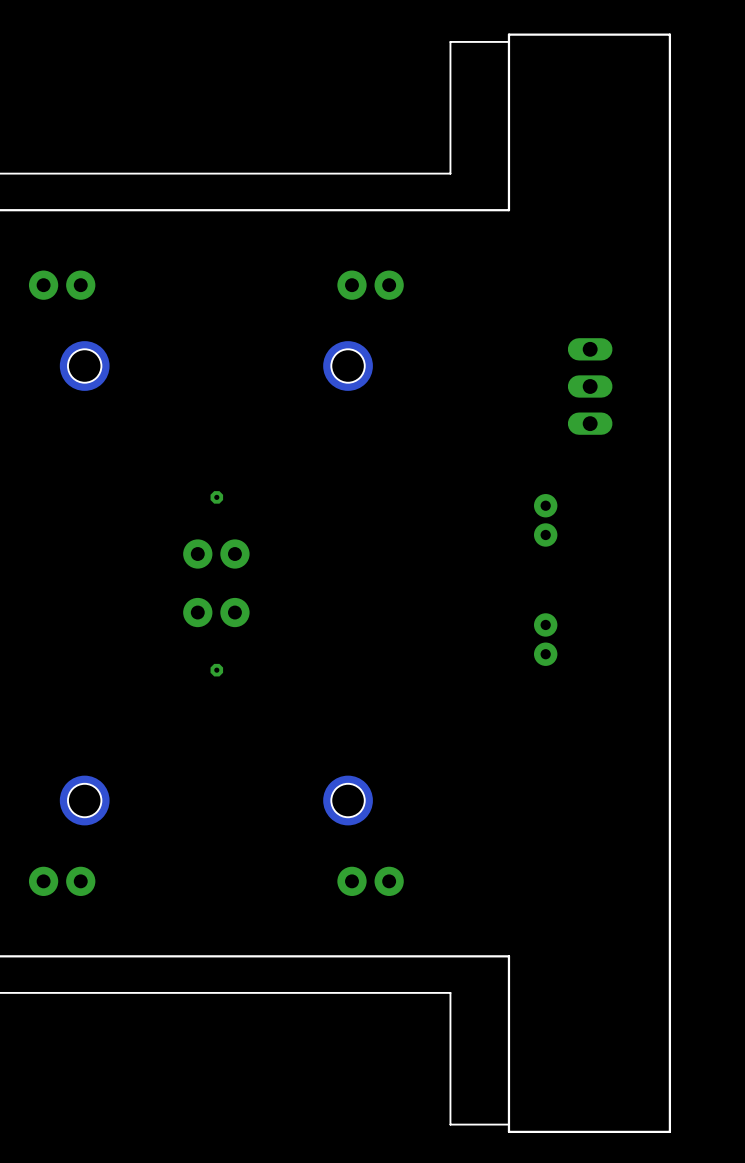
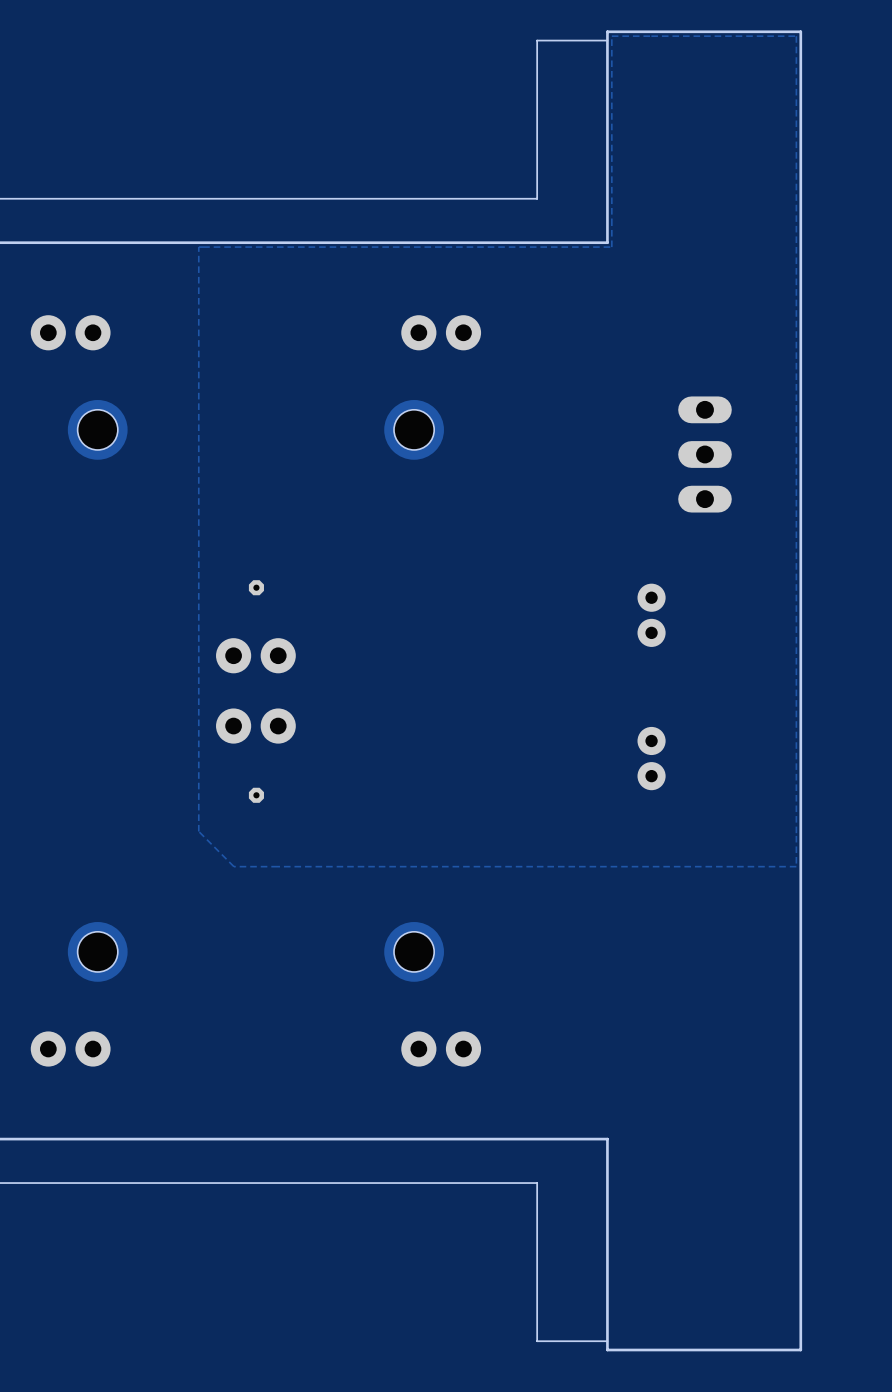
zone outline: none -> (796, 36) (796, 866) (233, 866) (198, 831) (198, 247) (611, 247) (611, 36) (796, 36)

